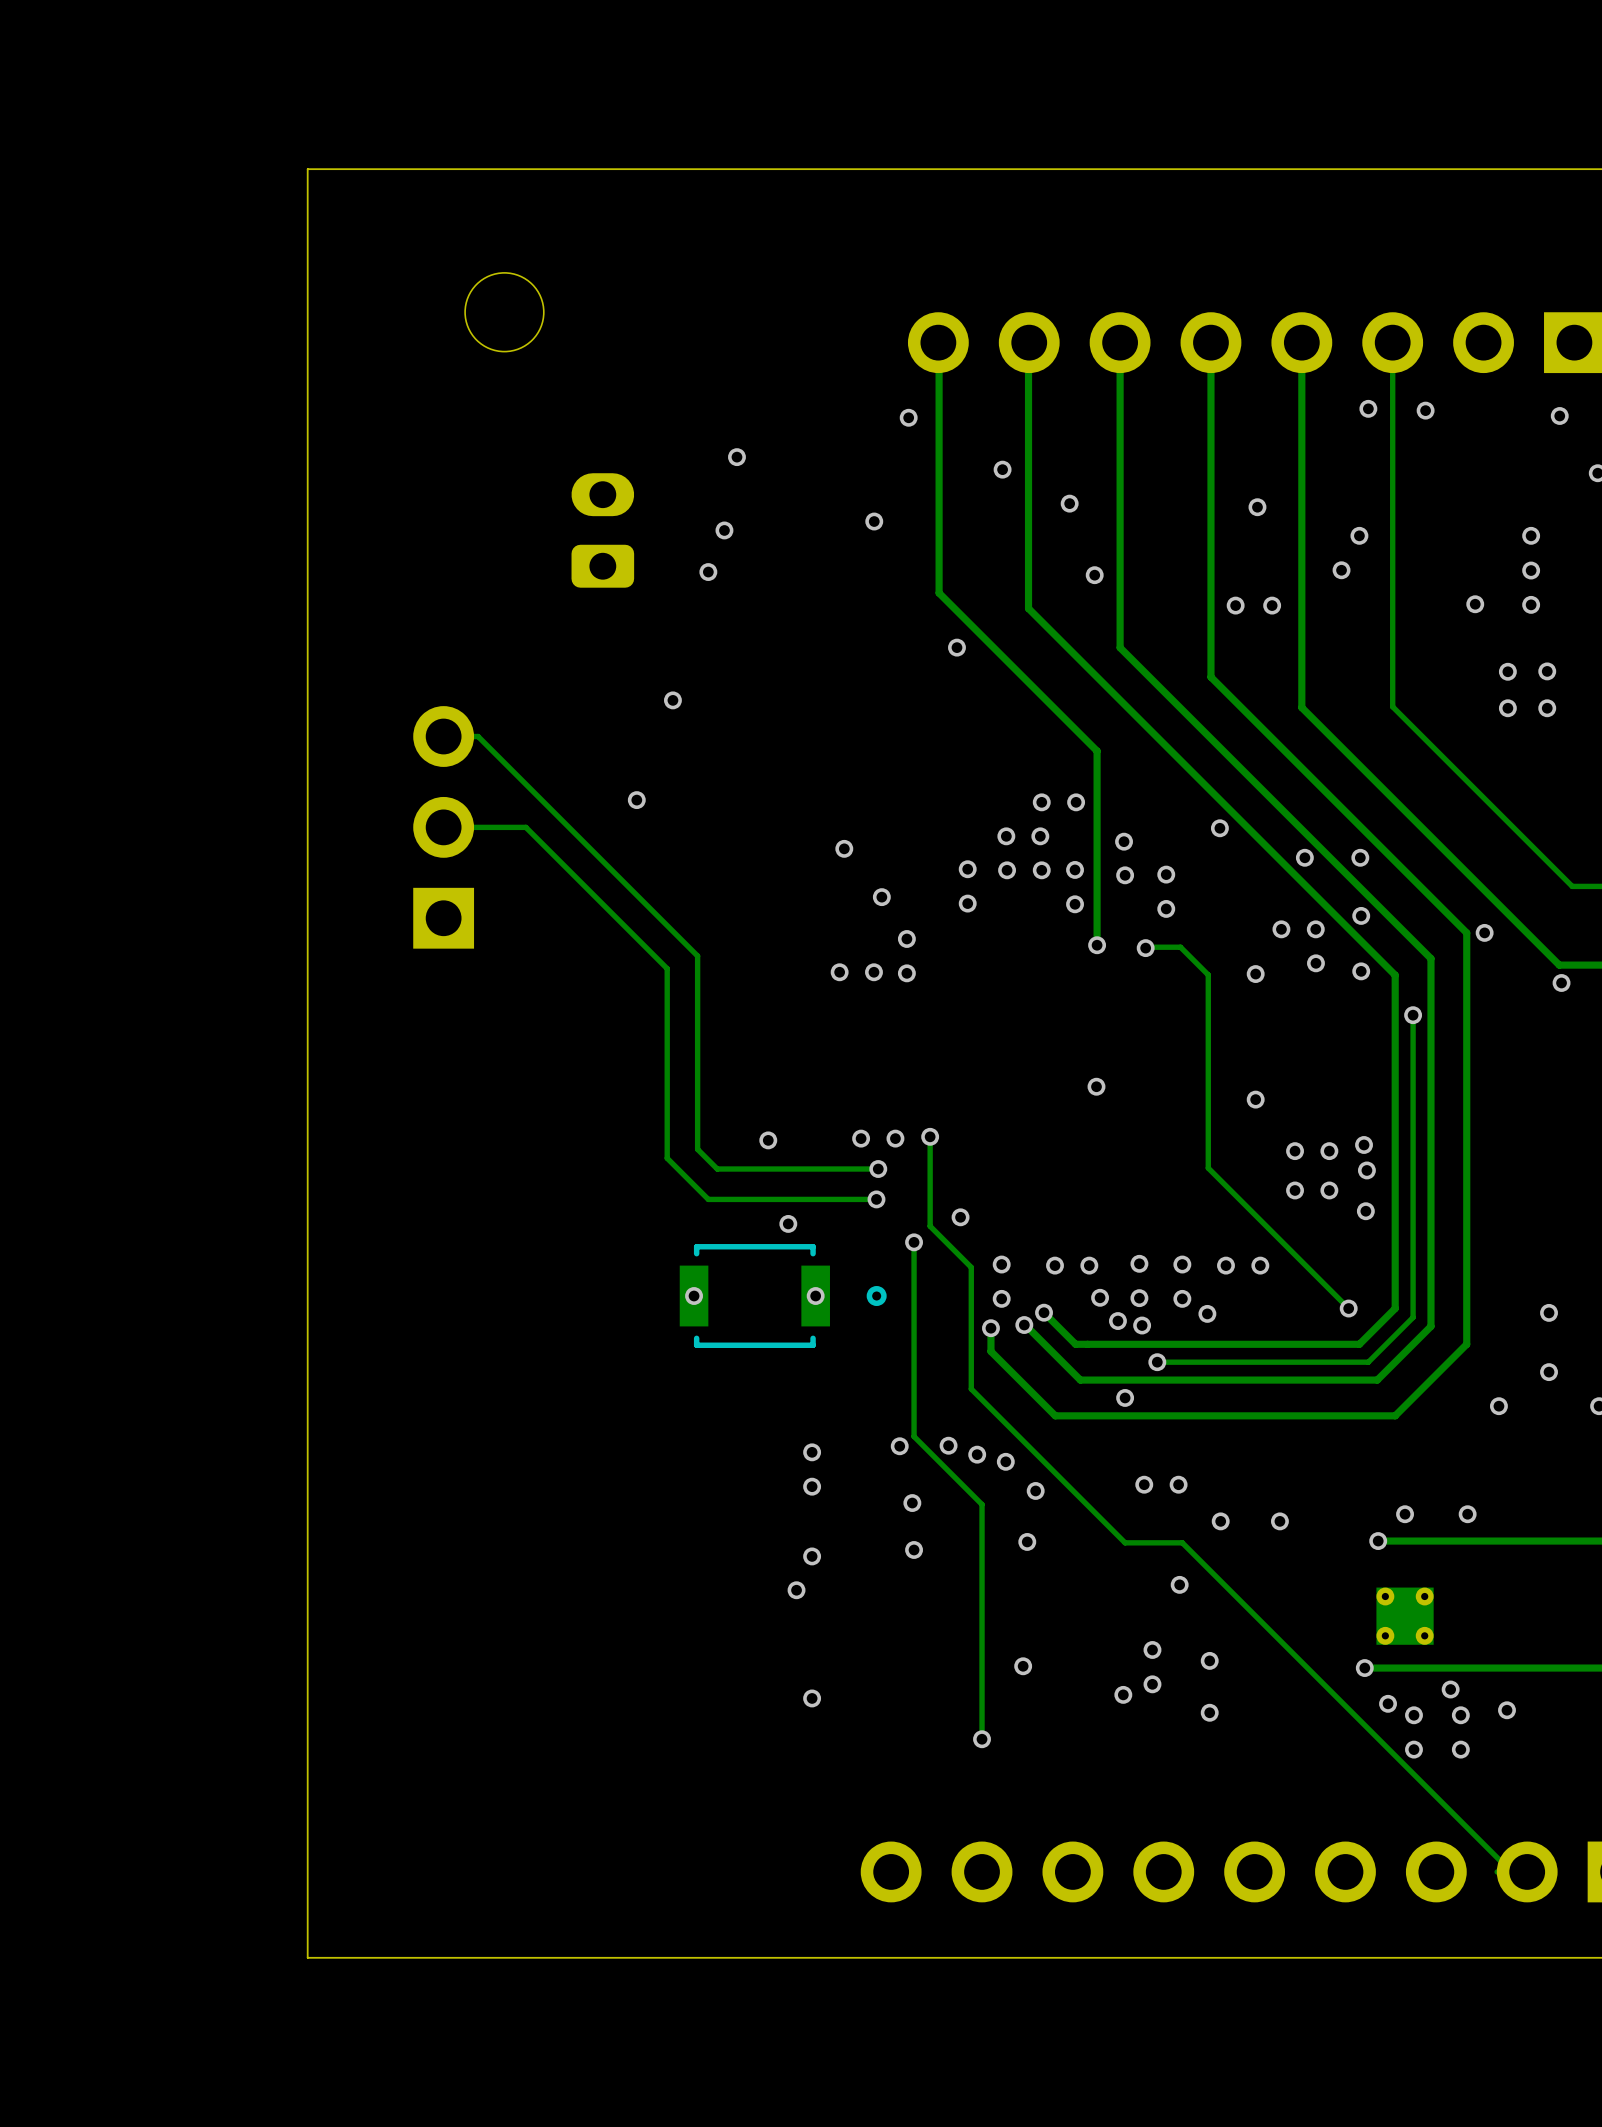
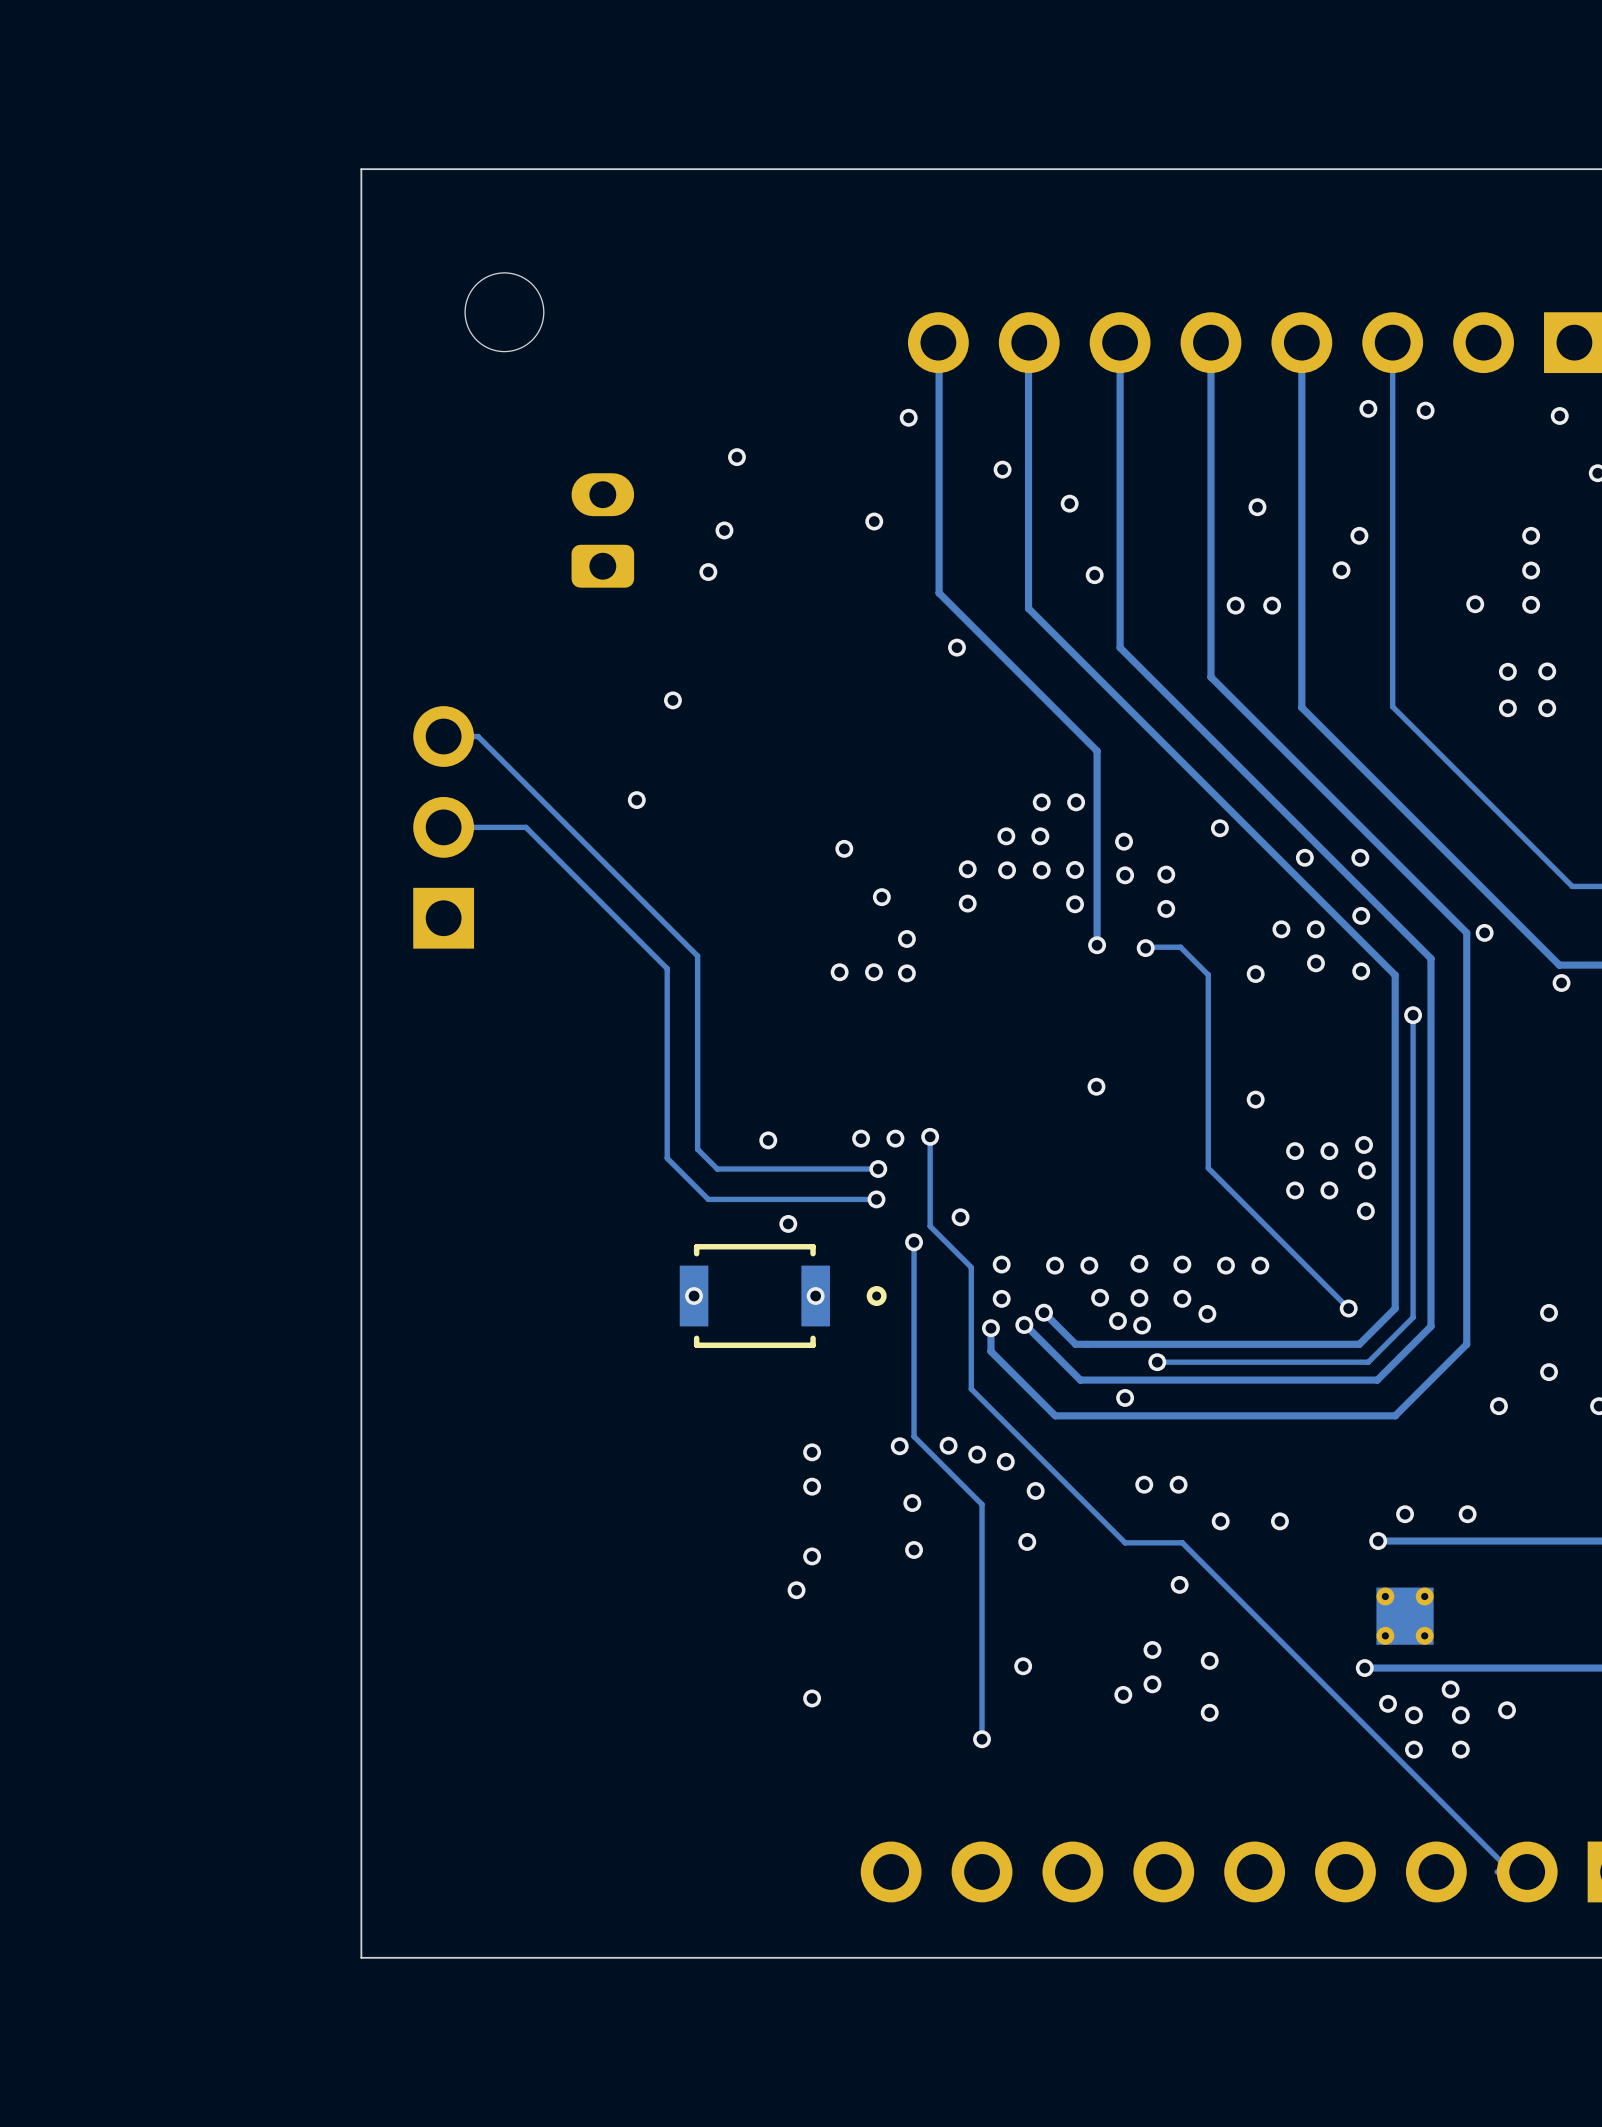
board edge: (361, 169) (307, 169) (307, 1957) (361, 1957) -> (361, 169) (361, 1957)

